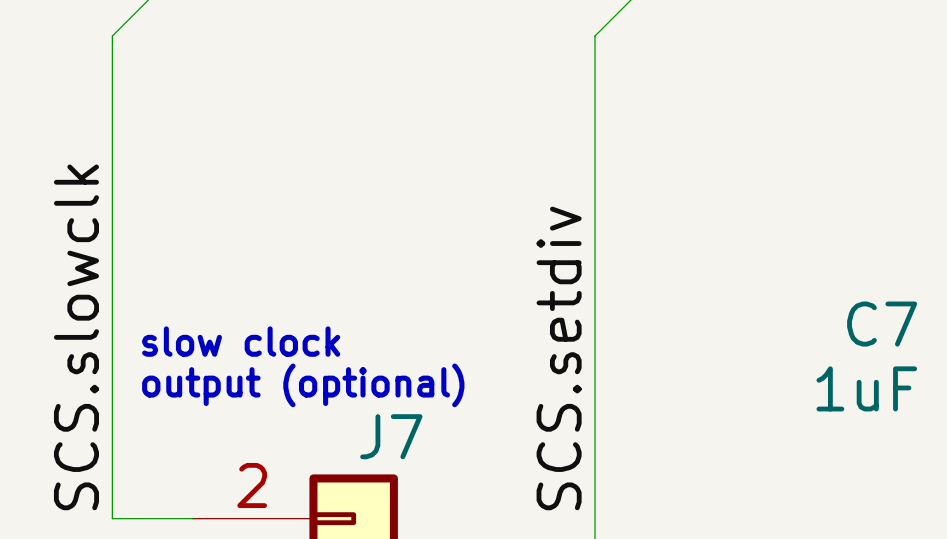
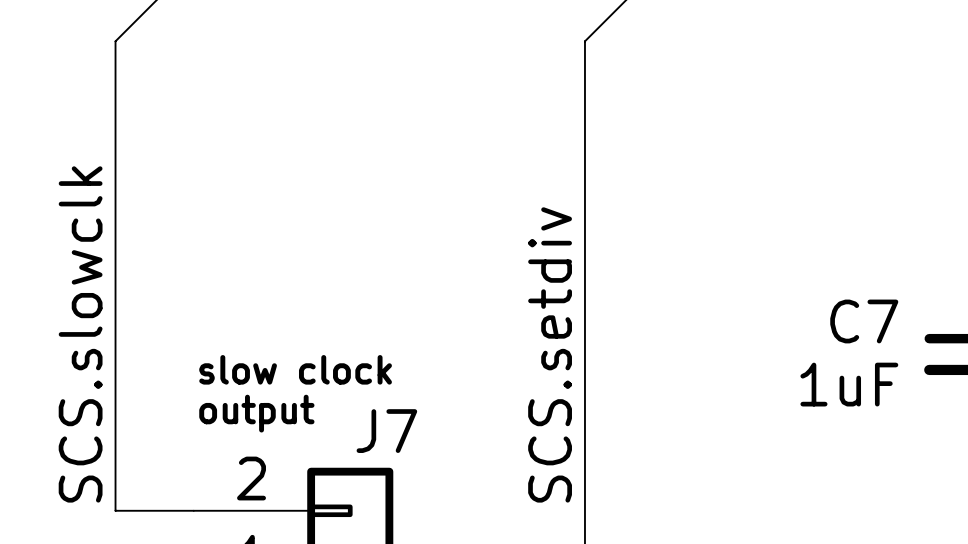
text position: slow clock (241, 341) -> slow clock (295, 369)
text: output (optional) (303, 385) -> none
text: none -> output (256, 413)

